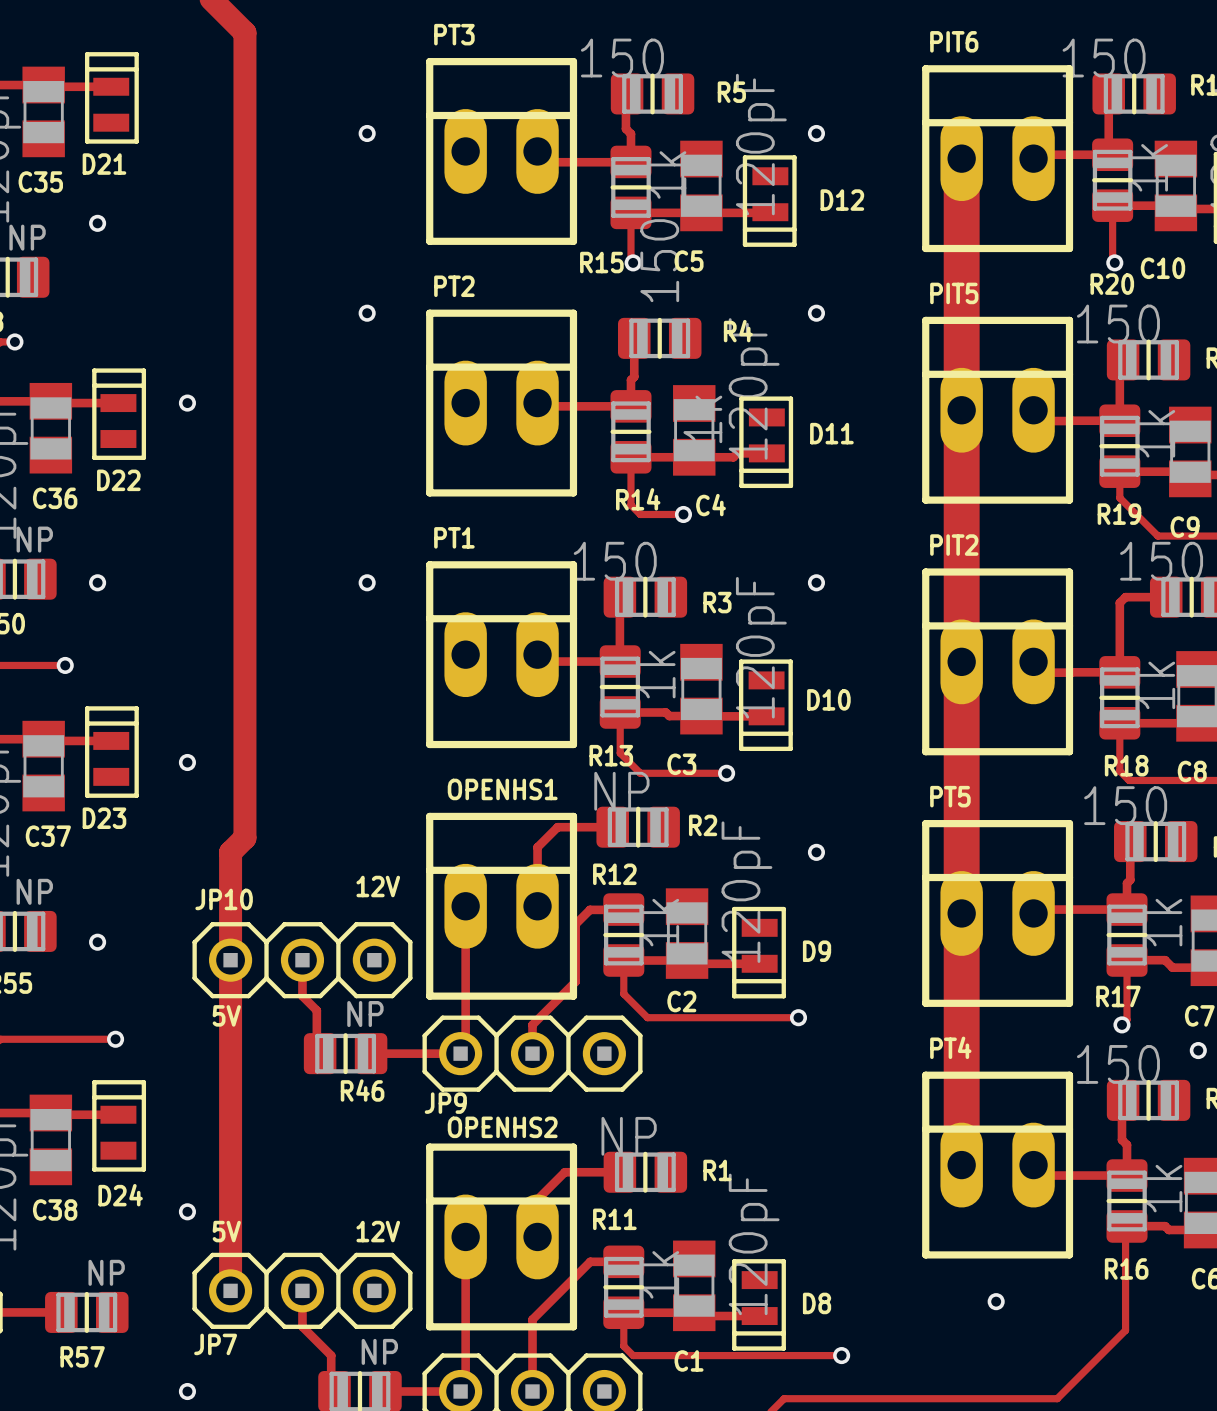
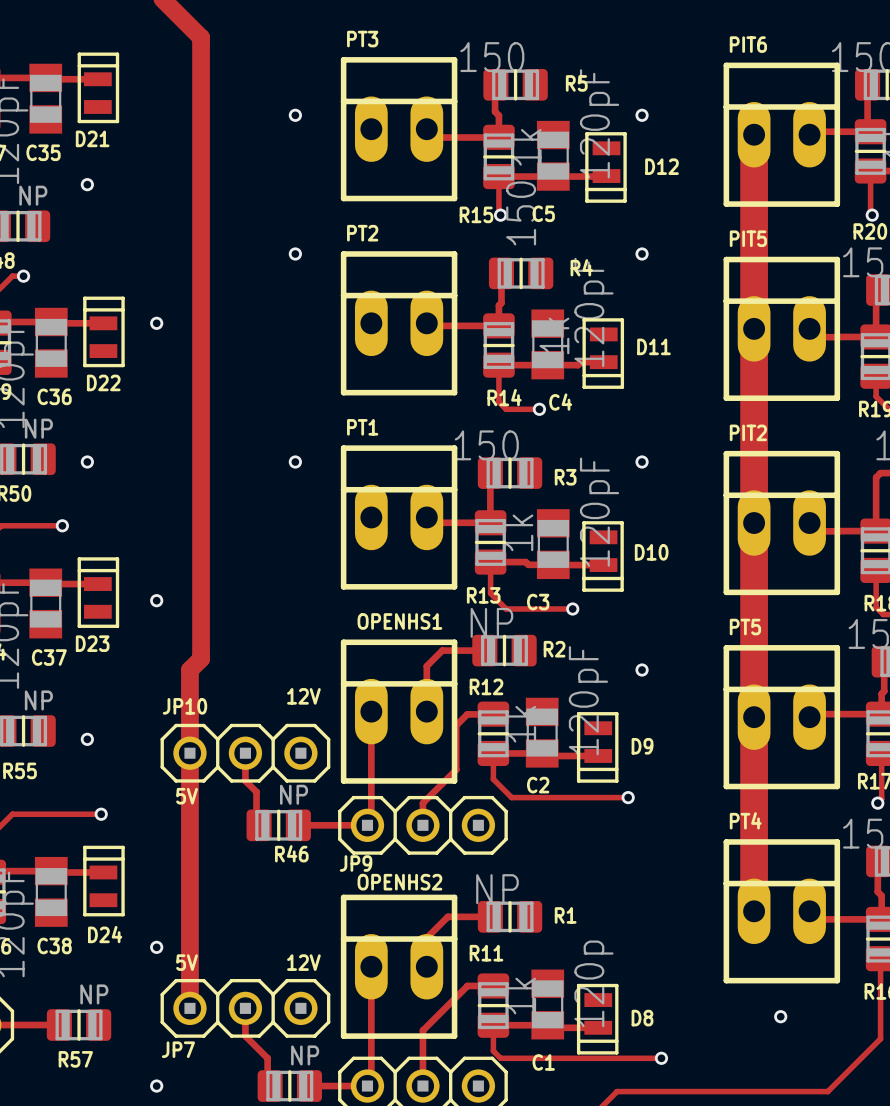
C1 value: 120pF (754, 1244) -> 120p (593, 983)

